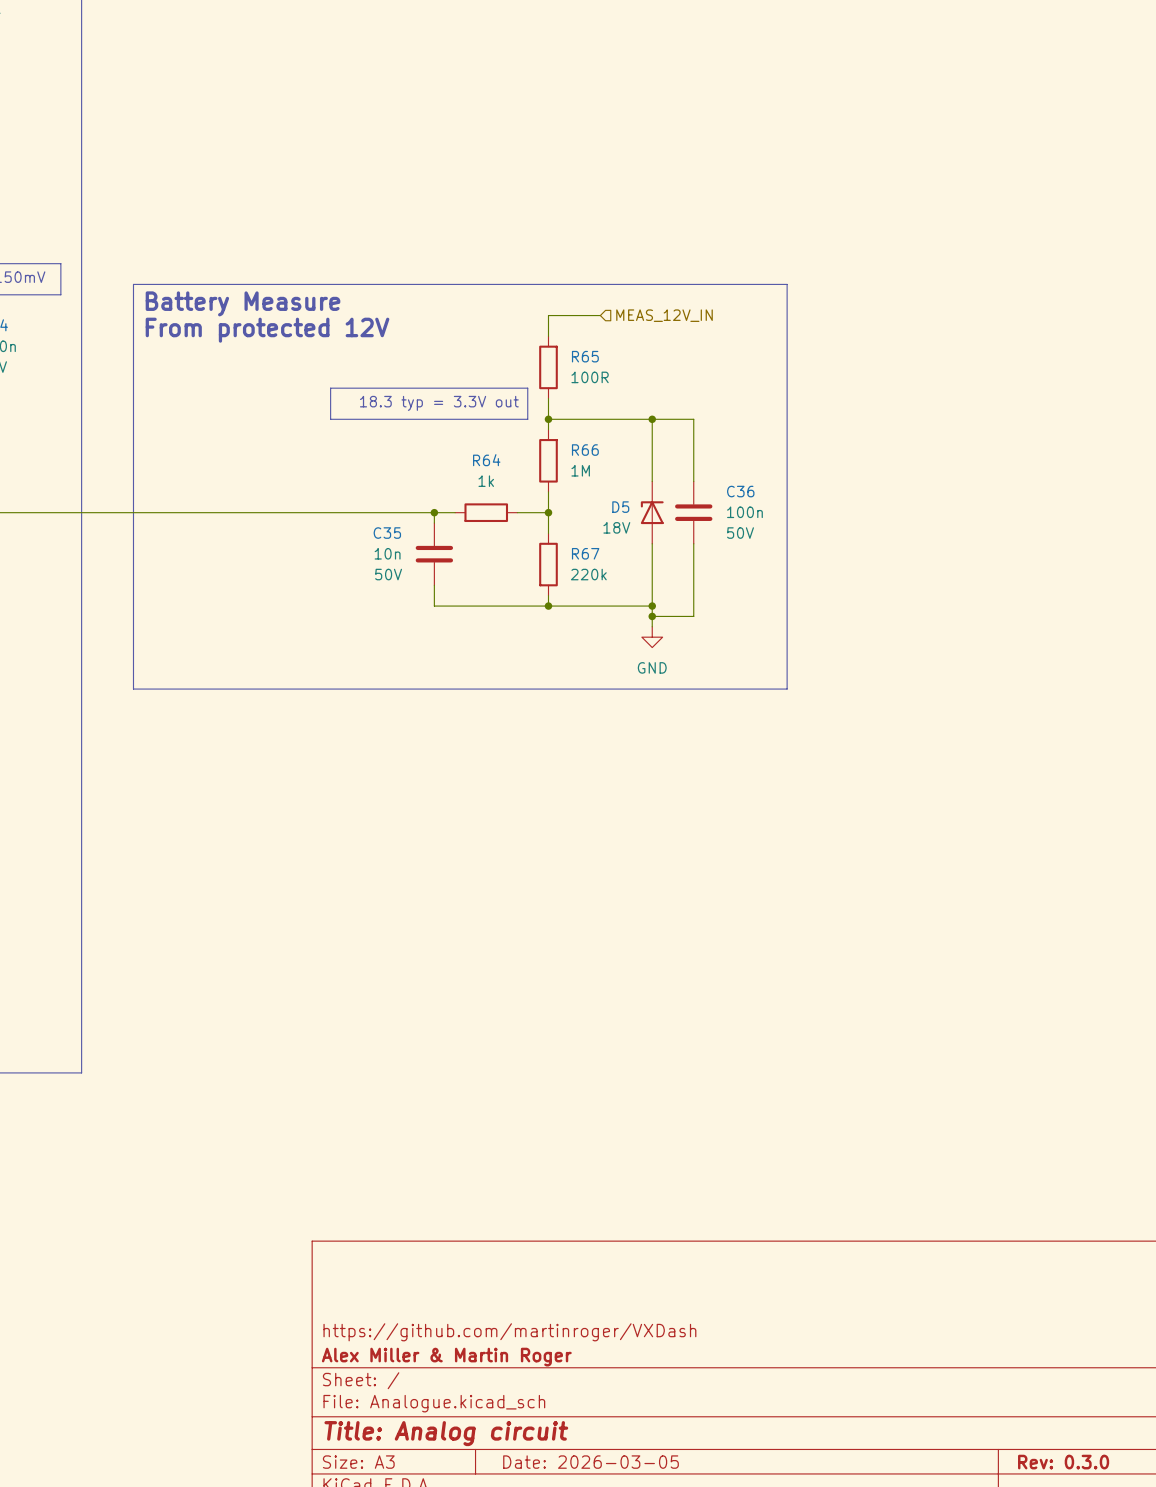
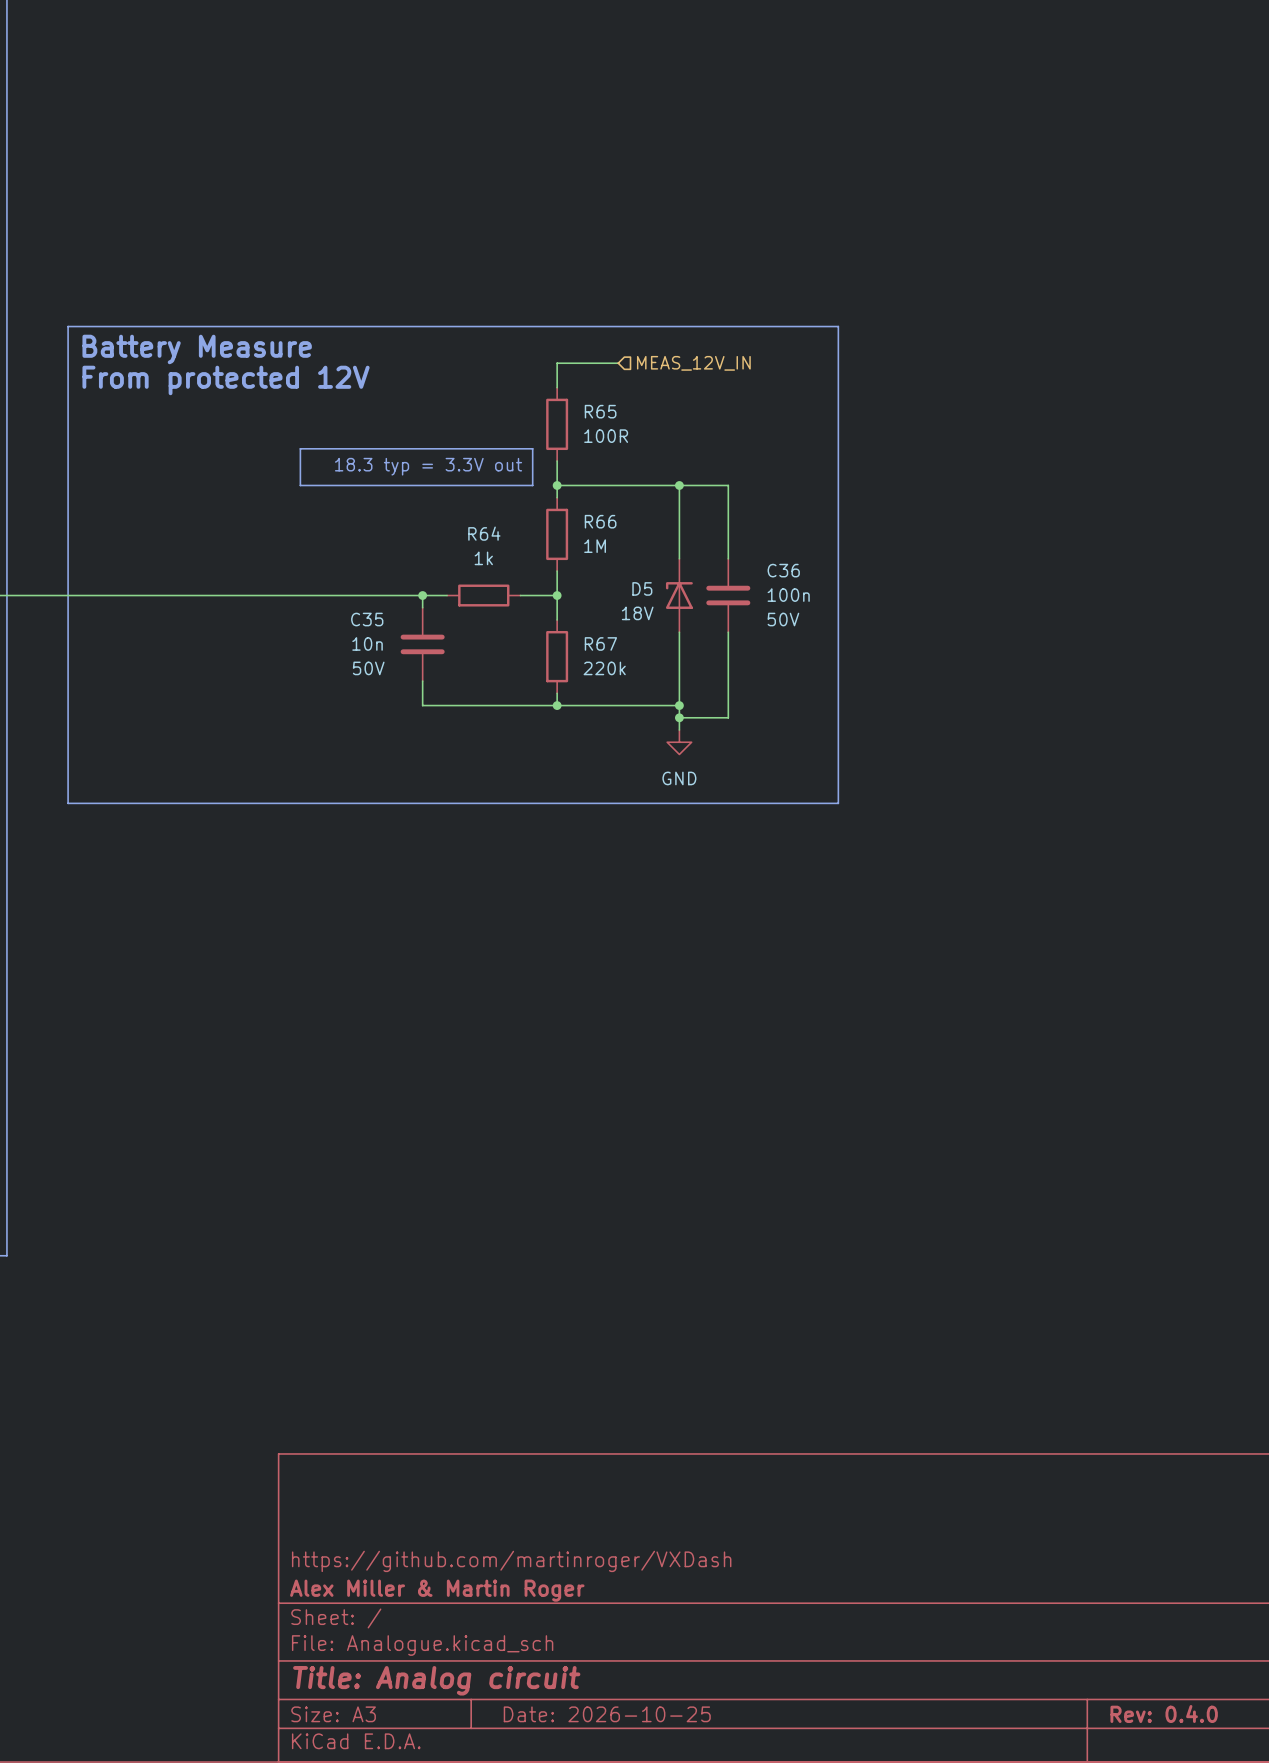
title block: Date: 2026-03-05 (591, 1462) -> Date: 2026-10-25 (607, 1714)
title block: Rev: 0.3.0 (1063, 1462) -> Rev: 0.4.0 (1164, 1713)

